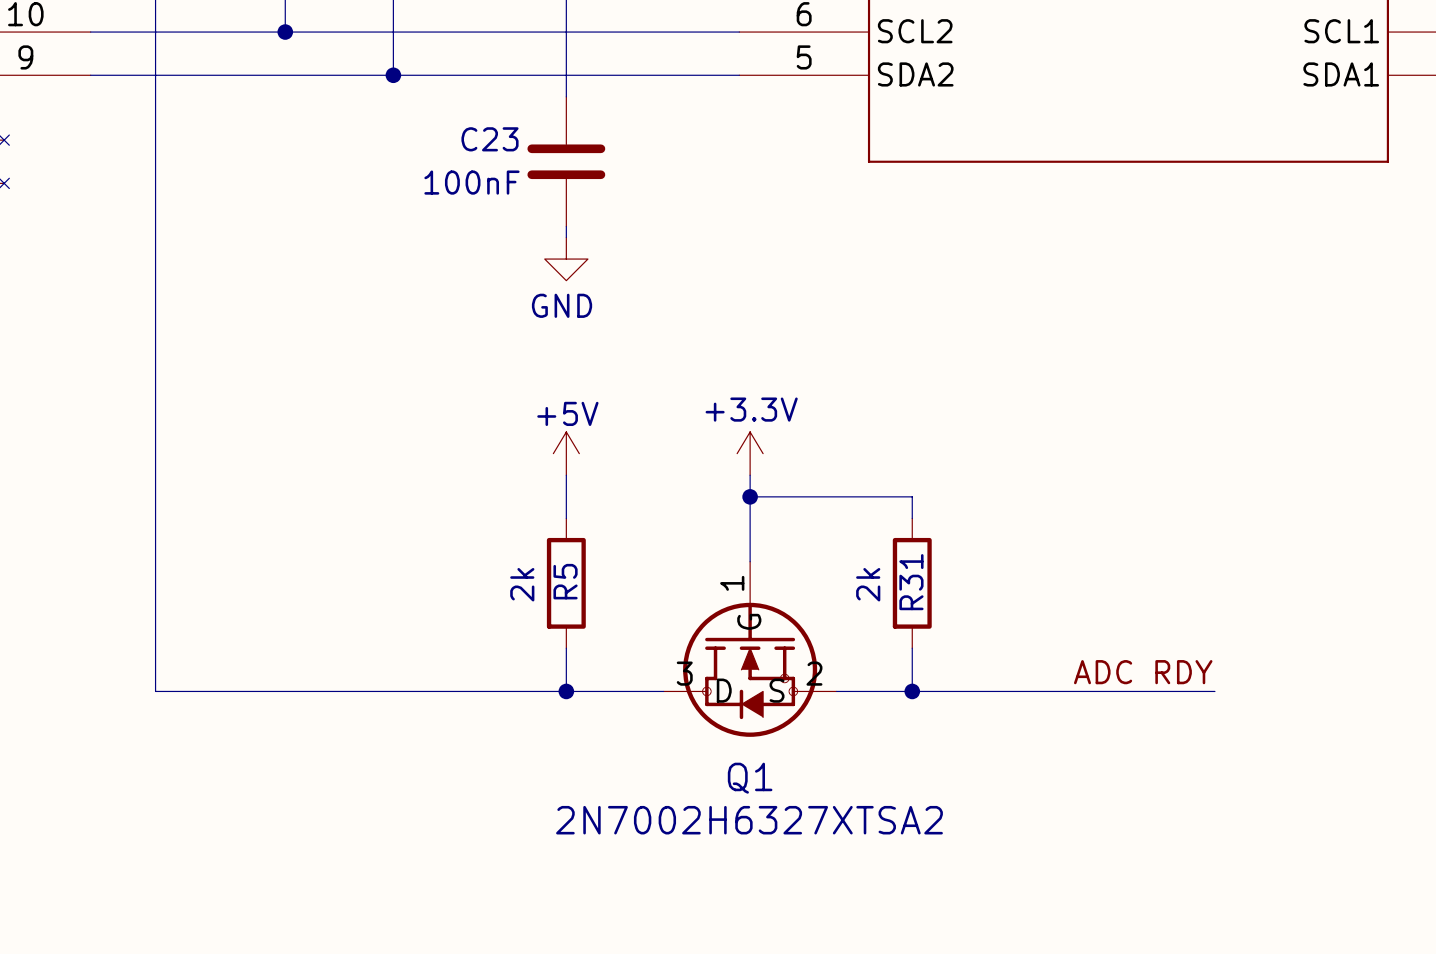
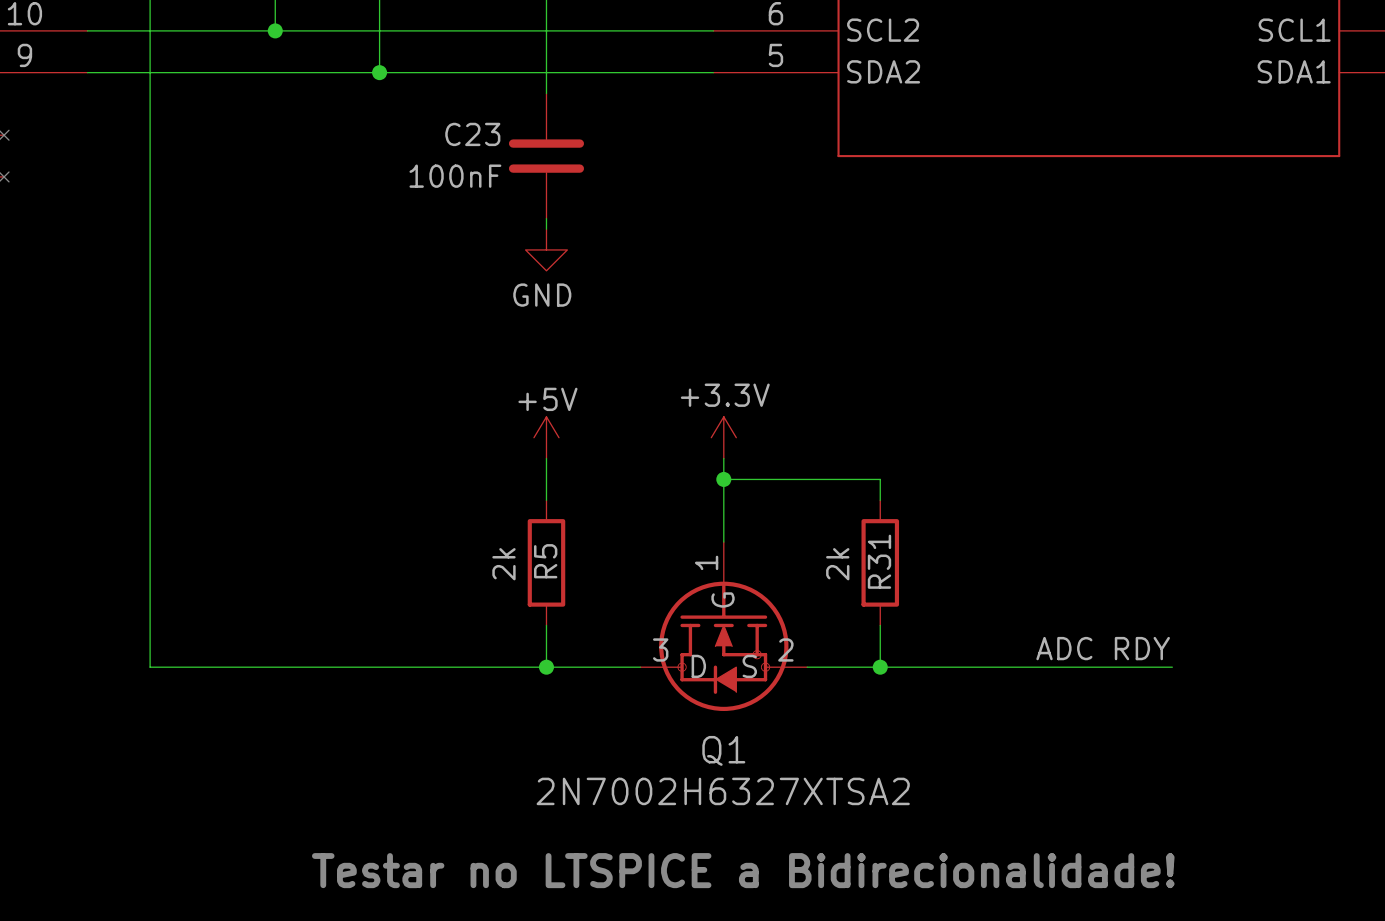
text: none -> Testar no LTSPICE a Bidirecionalidade! (743, 870)

